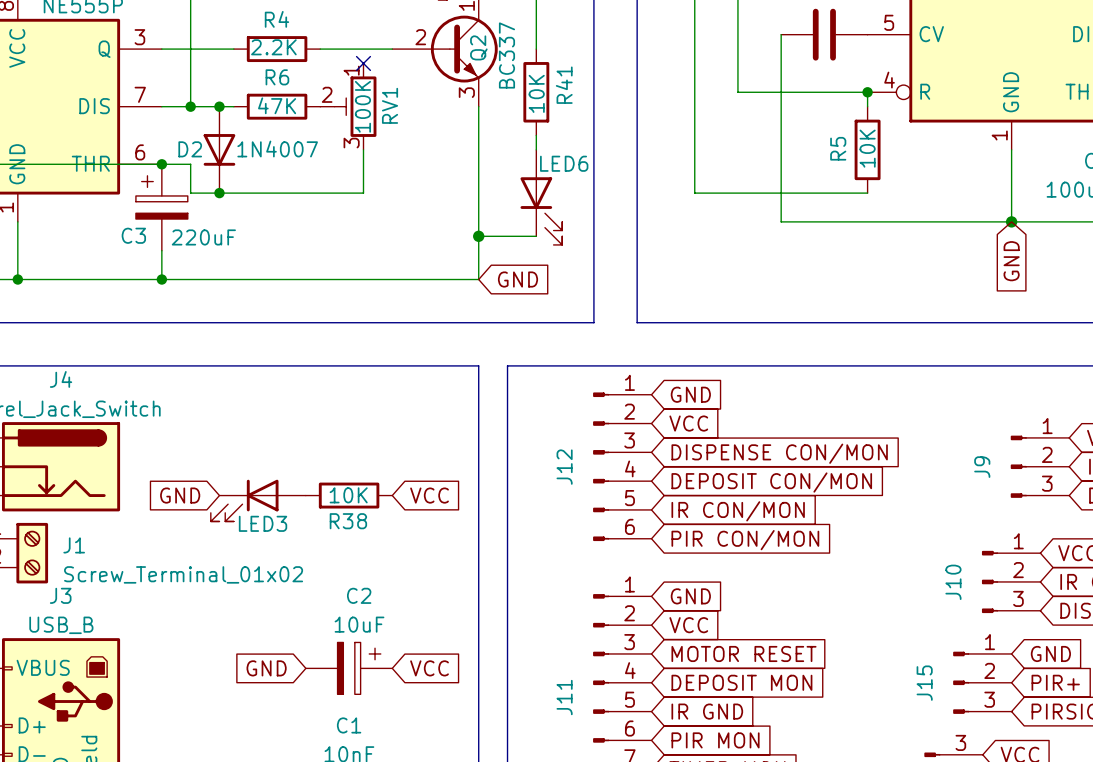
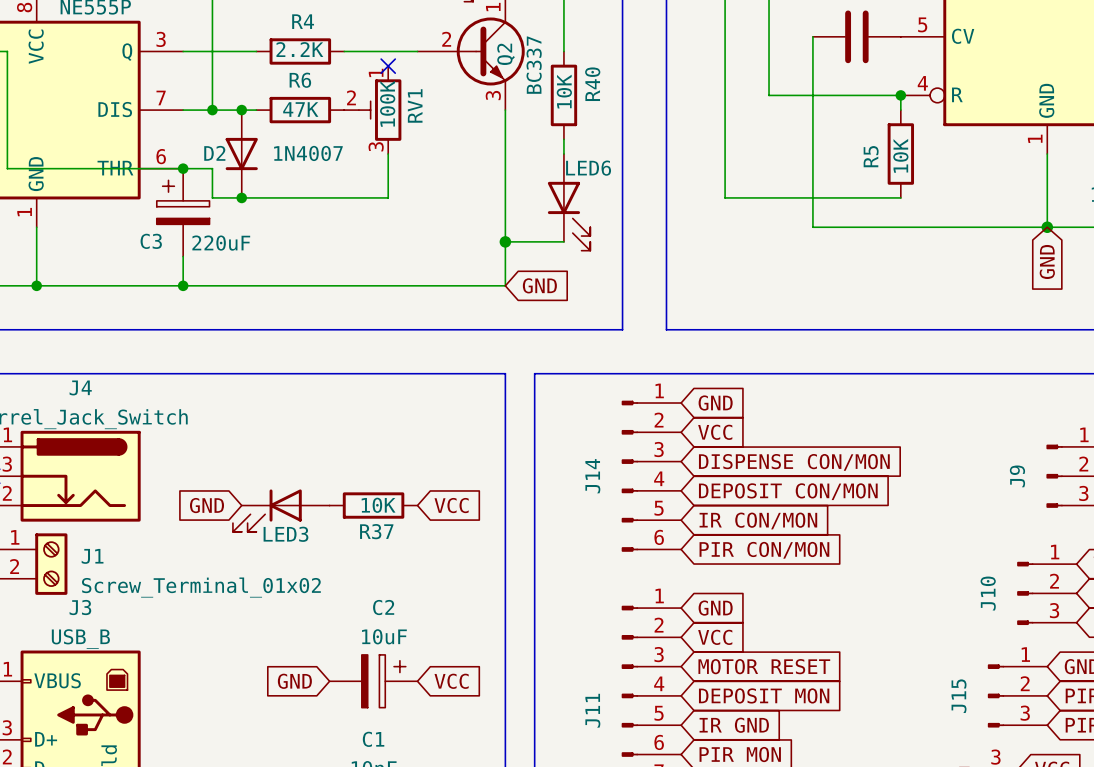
R41 name: R41 (564, 85) -> R40 (592, 84)
J12 name: J12 (564, 467) -> J14 (592, 476)
R38 name: R38 (348, 521) -> R37 (376, 531)

